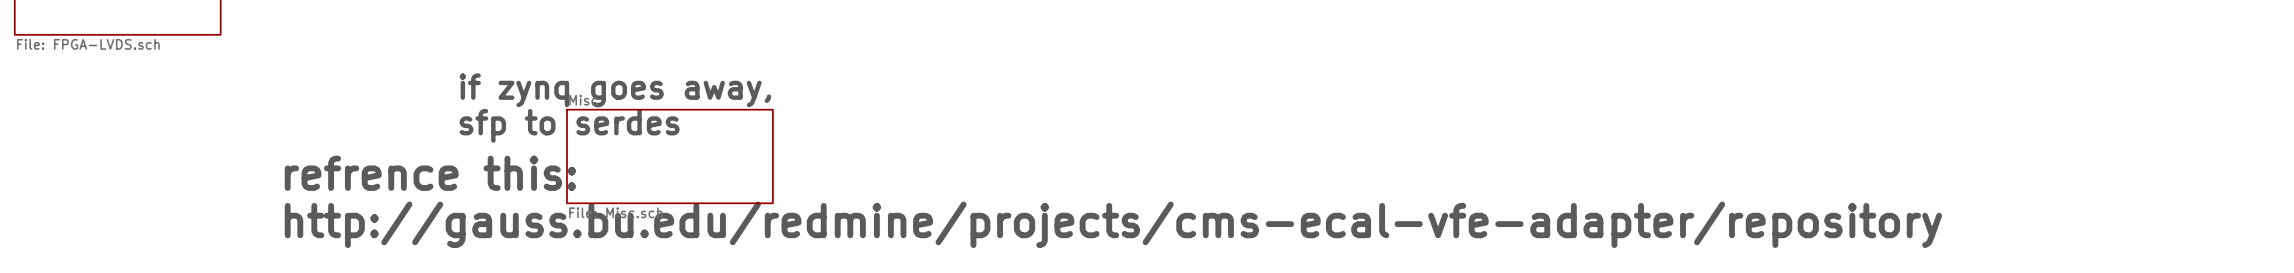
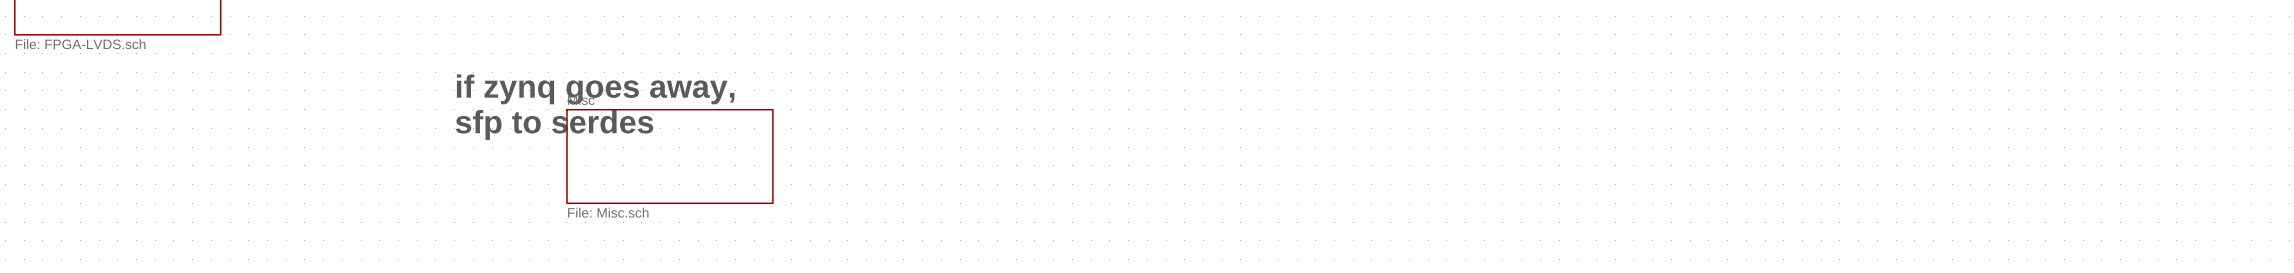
text: refrence this: (430, 173) -> none
text: http://gauss.bu.edu/redmine/projects/cms-ecal-vfe-adapter/repository (1113, 224) -> none

